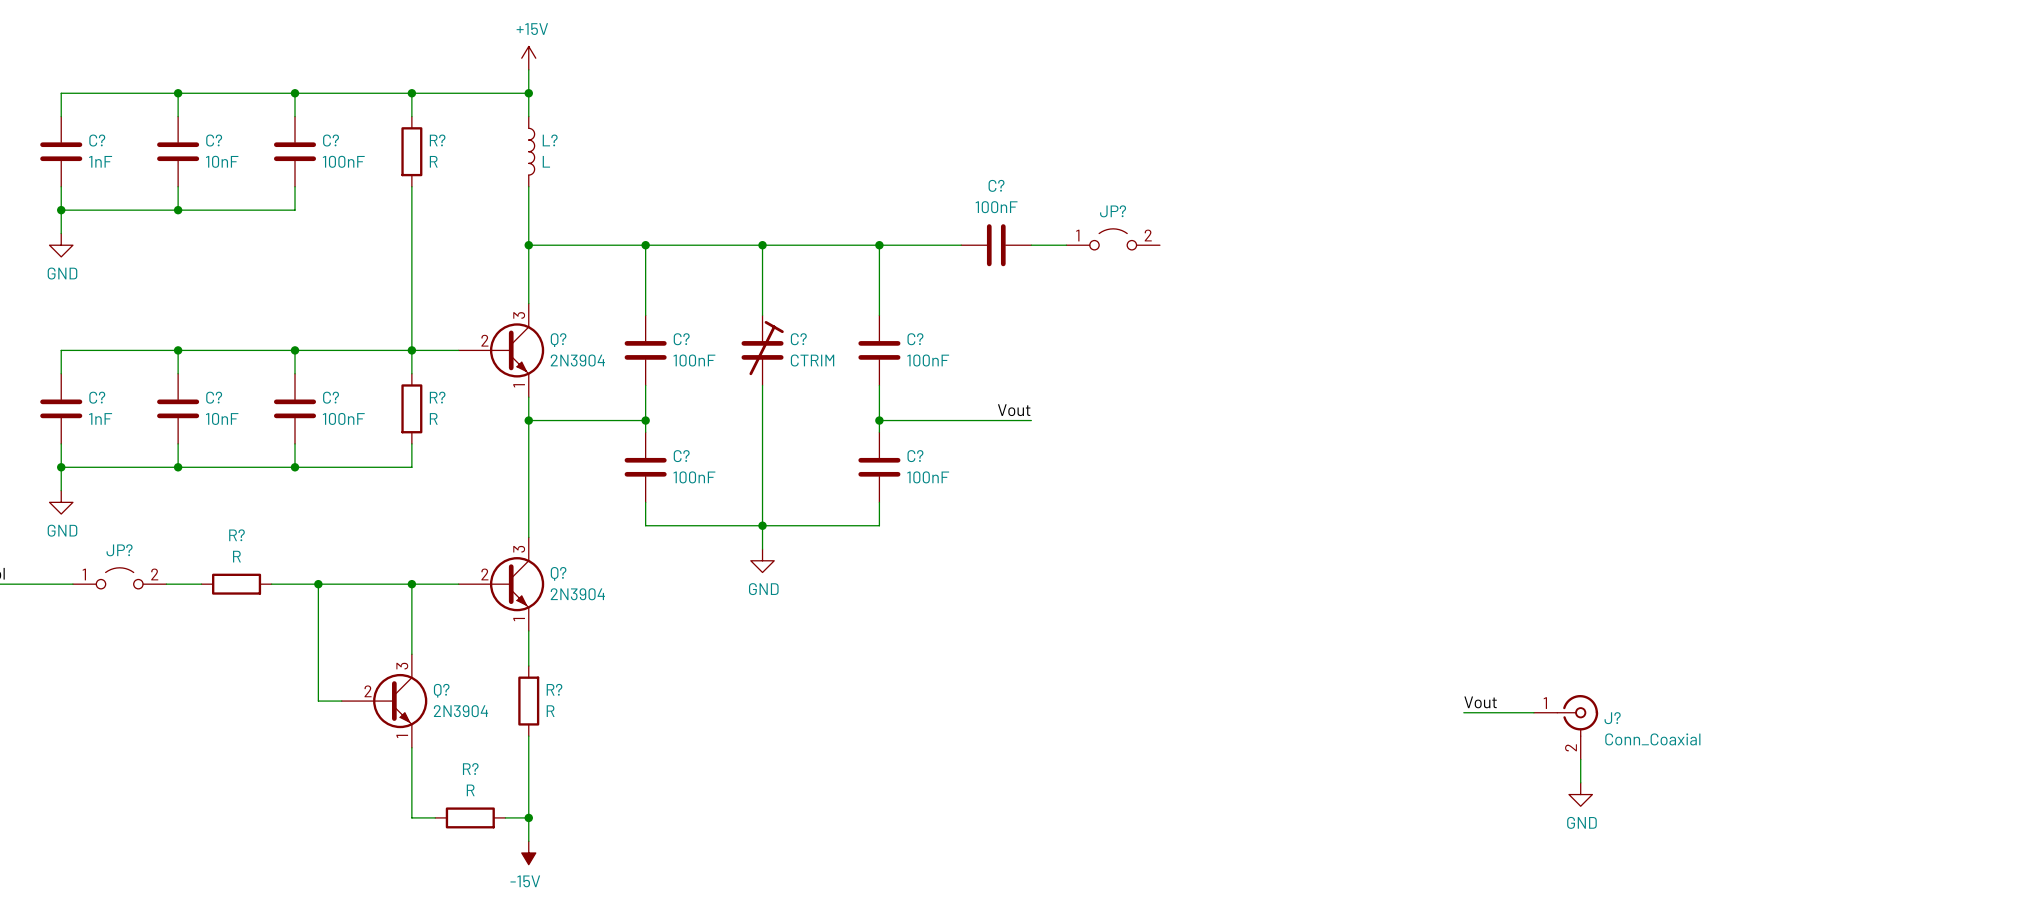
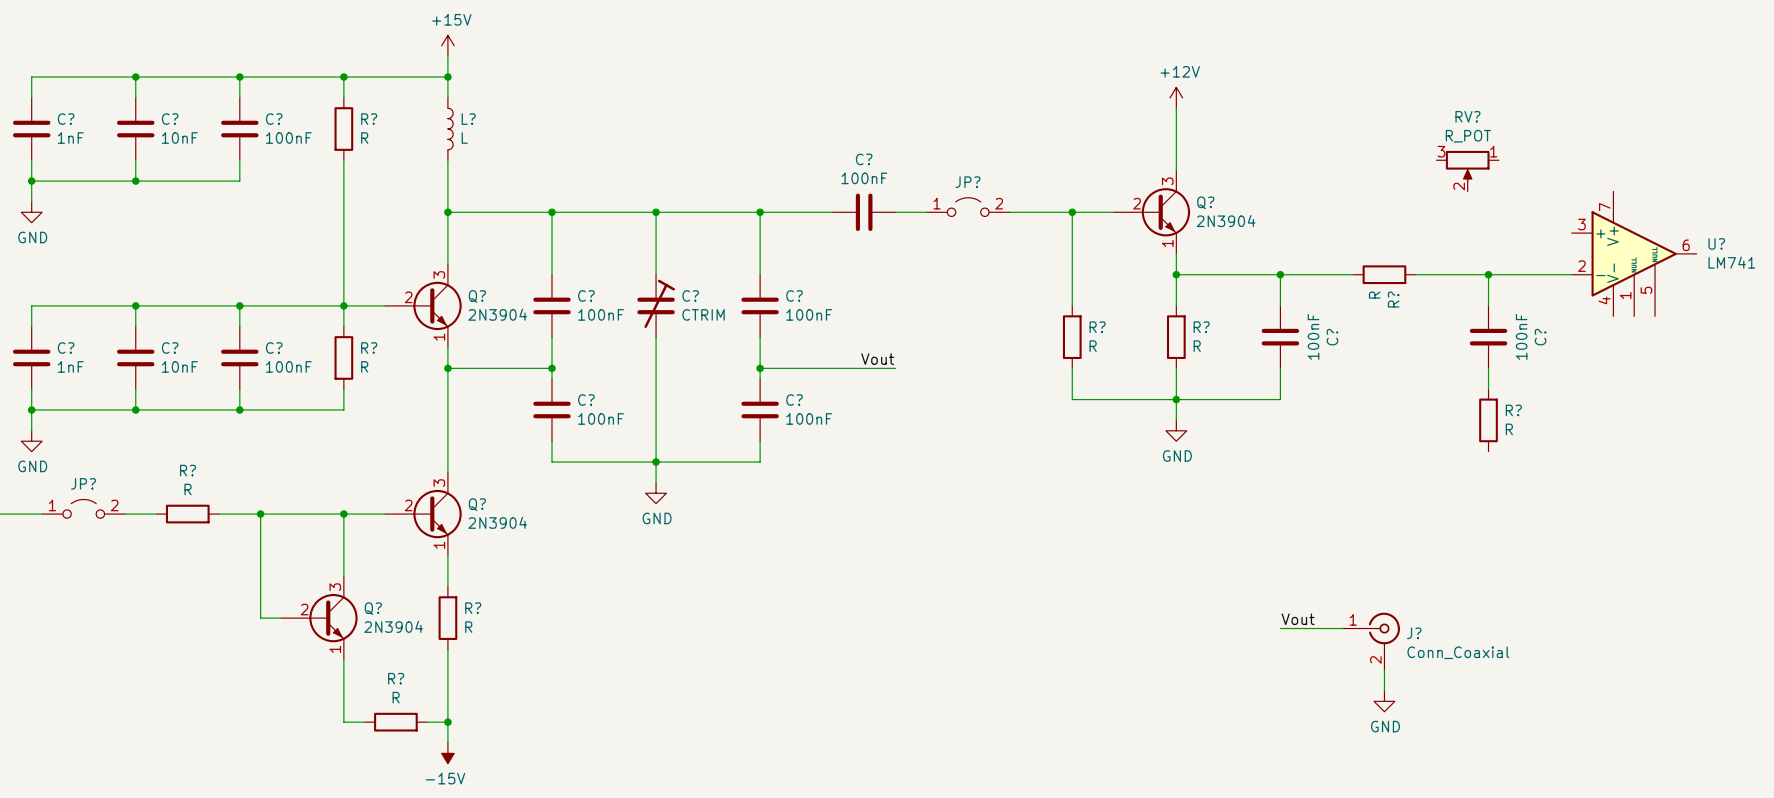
power symbol: none -> +12V (1176, 97)
wire: none -> (1176, 108) (1176, 170)
RV?: none -> R_POT (1467, 171)
wire: none -> (1009, 212) (1113, 212)
wire: none -> (1072, 212) (1072, 305)
junction: none -> (1072, 212)
Q?: none -> 2N3904 (1151, 212)
wire: none -> (1176, 253) (1176, 305)
U?: none -> LM741 (1634, 253)
wire: none -> (1176, 274) (1353, 274)
junction: none -> (1176, 274)
wire: none -> (1280, 274) (1280, 305)
junction: none -> (1280, 274)
R?: none -> R (1384, 274)
wire: none -> (1415, 274) (1571, 274)
wire: none -> (1488, 274) (1488, 305)
junction: none -> (1488, 274)
R?: none -> R (1072, 337)
R?: none -> R (1176, 337)
C?: none -> 100nF (1280, 337)
C?: none -> 100nF (1488, 337)
wire: none -> (1072, 368) (1072, 399) (1280, 399) (1280, 368)
wire: none -> (1176, 368) (1176, 420)
wire: none -> (1488, 368) (1488, 389)
junction: none -> (1176, 399)
R?: none -> R (1488, 420)
power symbol: none -> GND (1176, 430)

